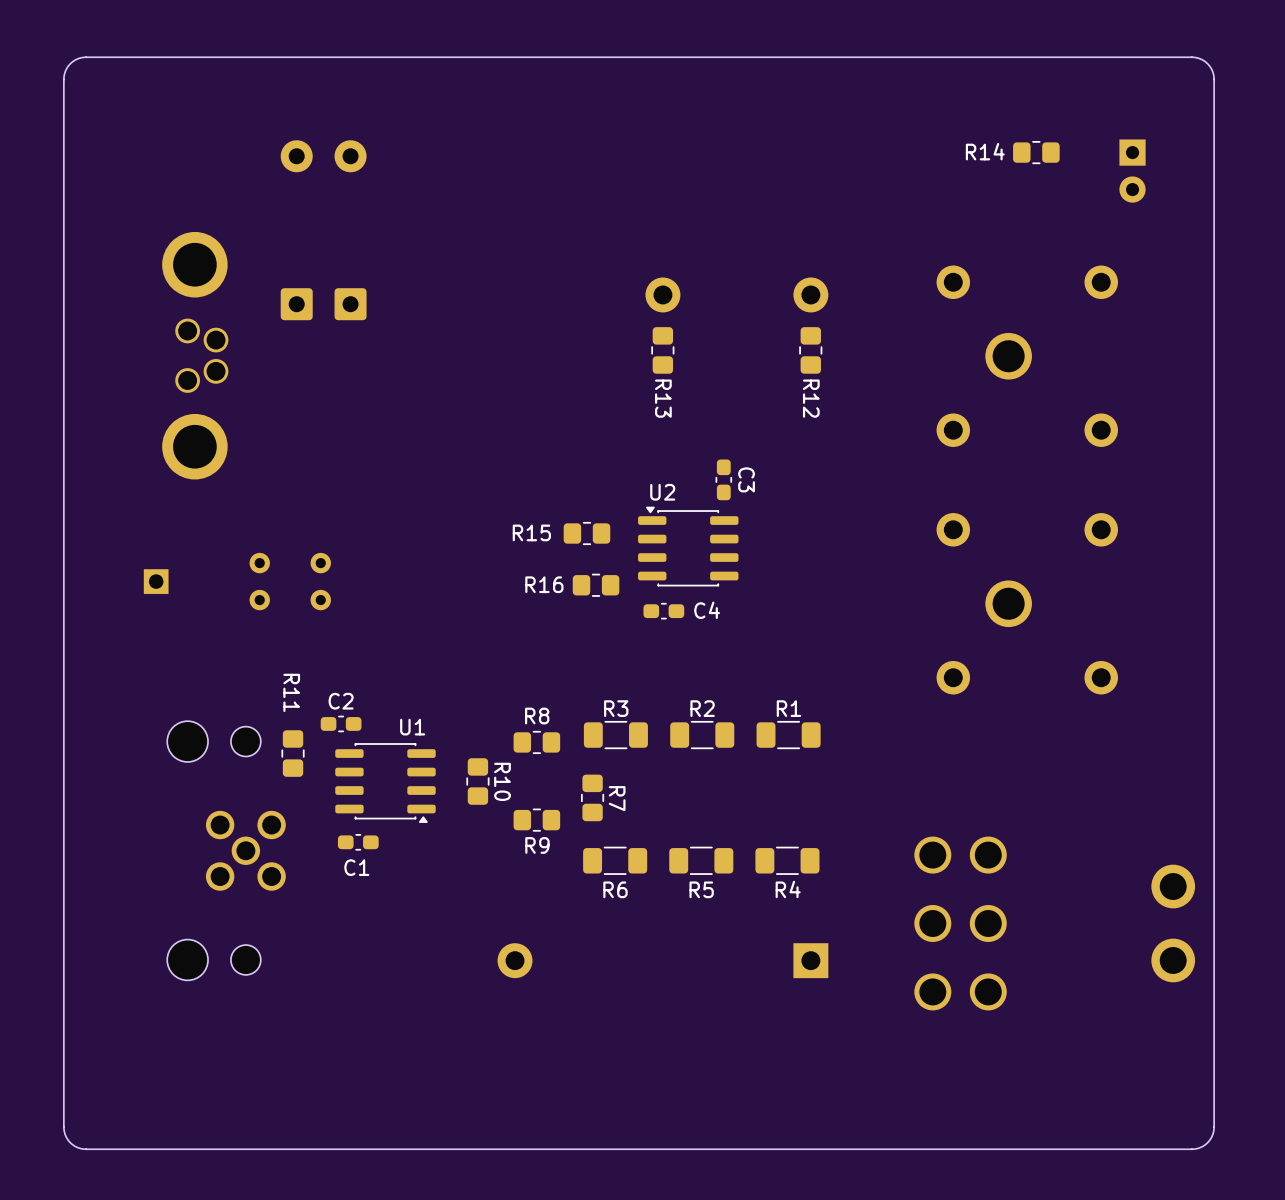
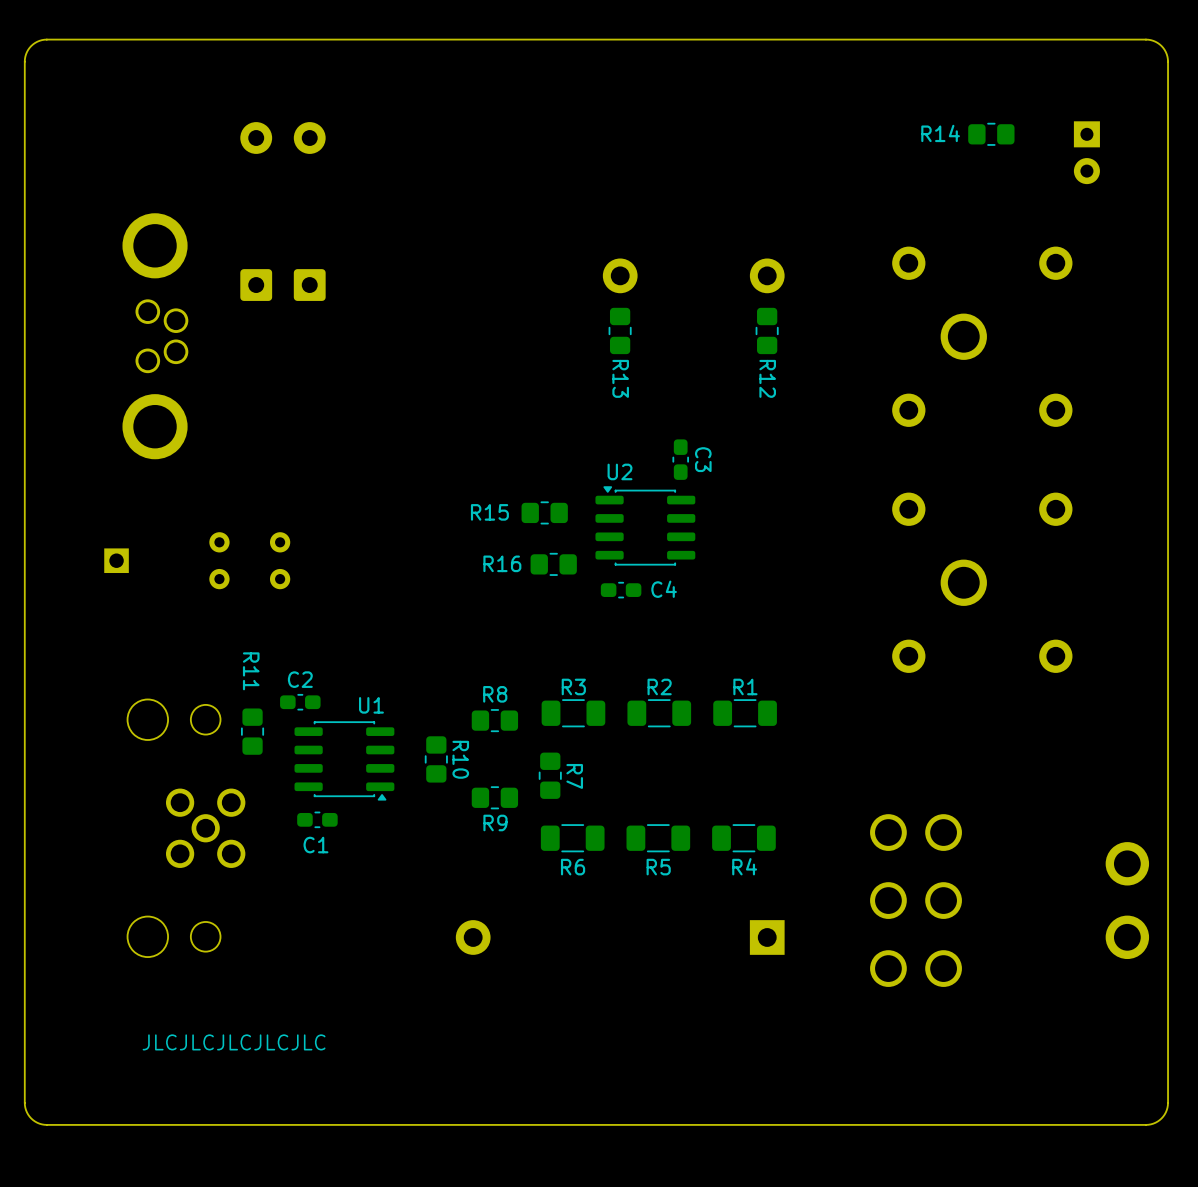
text: none -> JLCJLCJLCJLCJLC (234, 1042)

